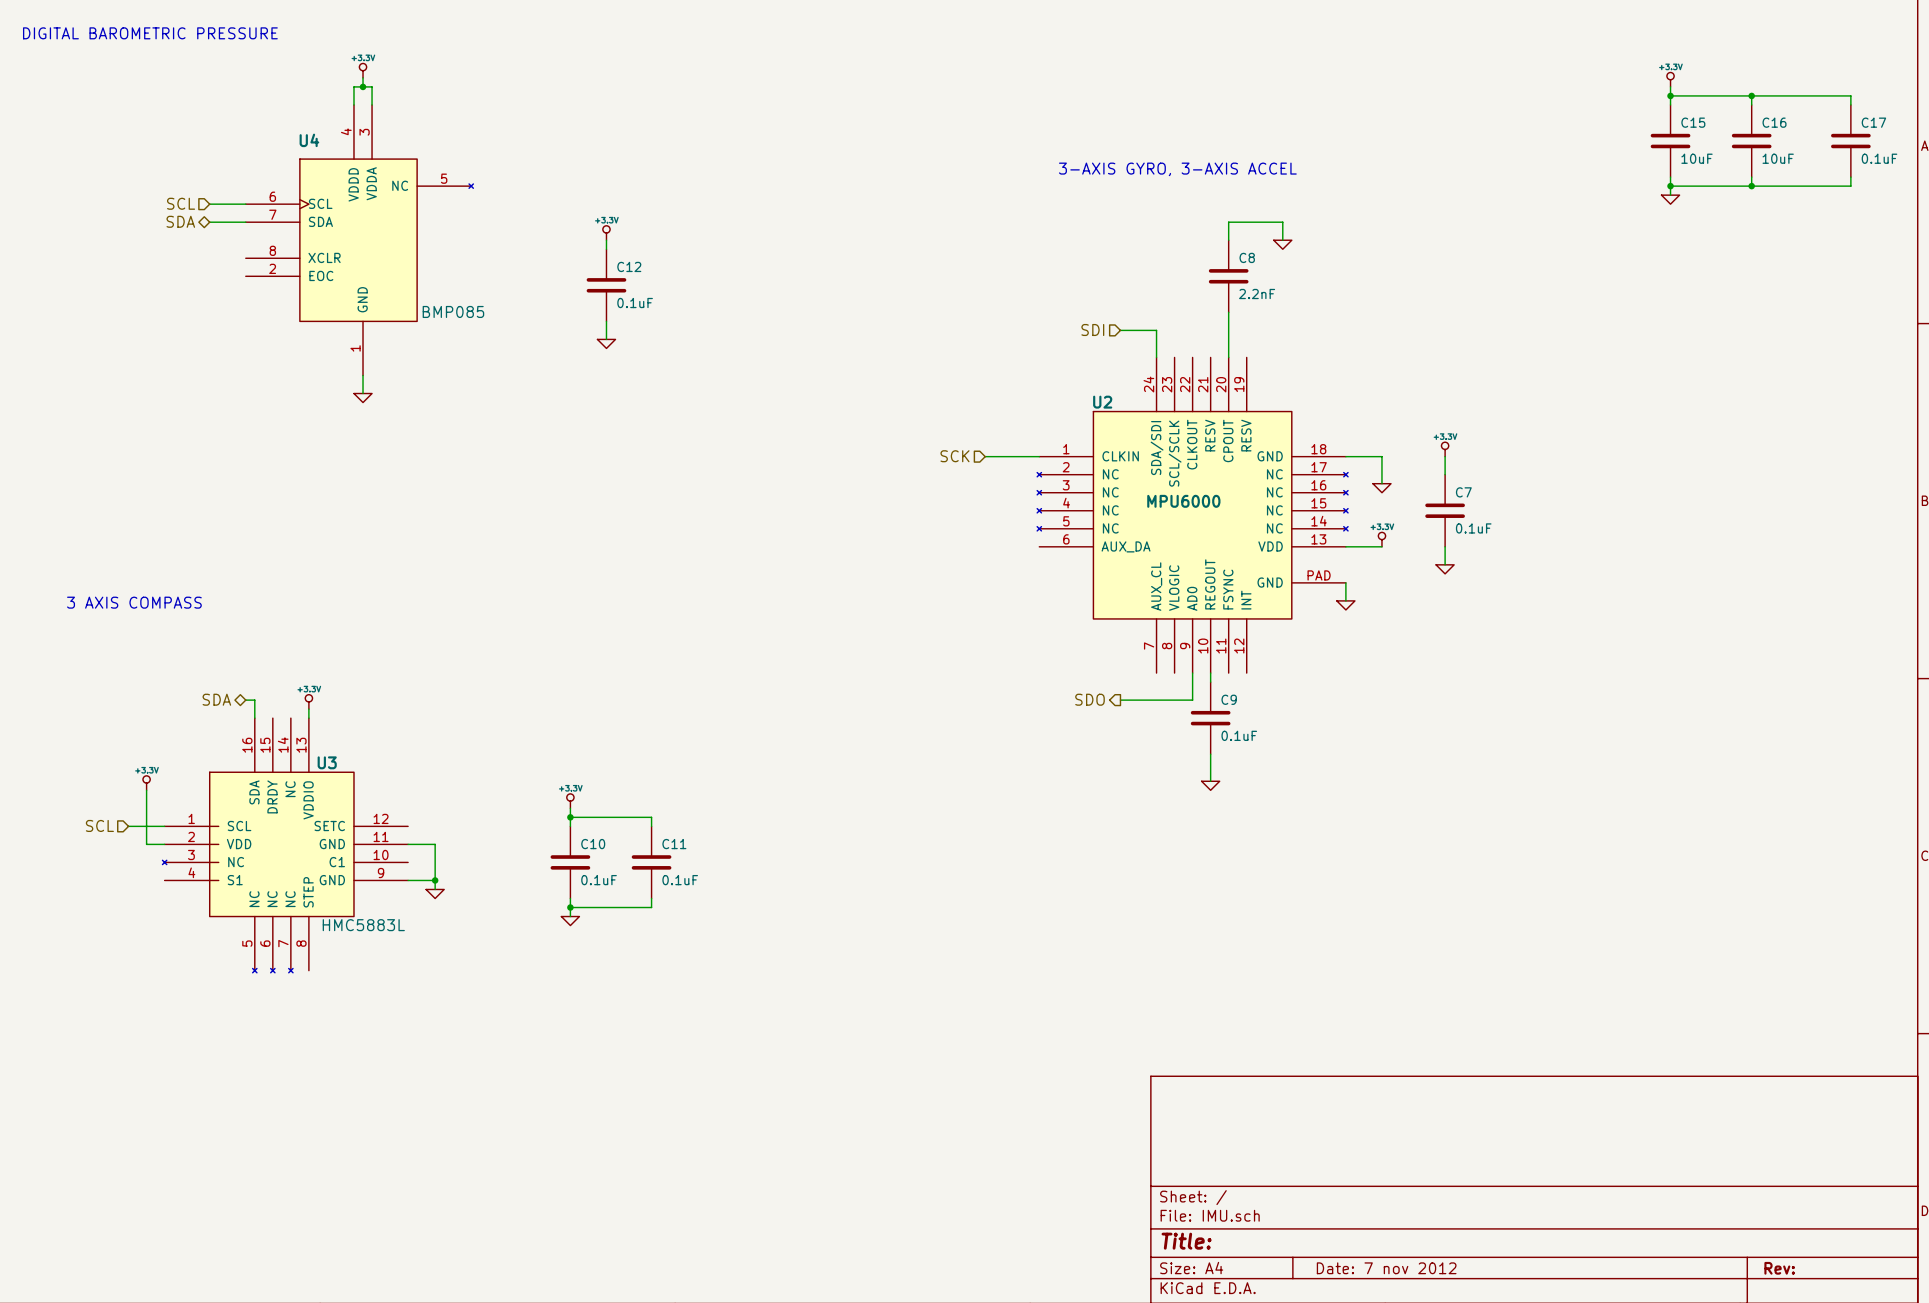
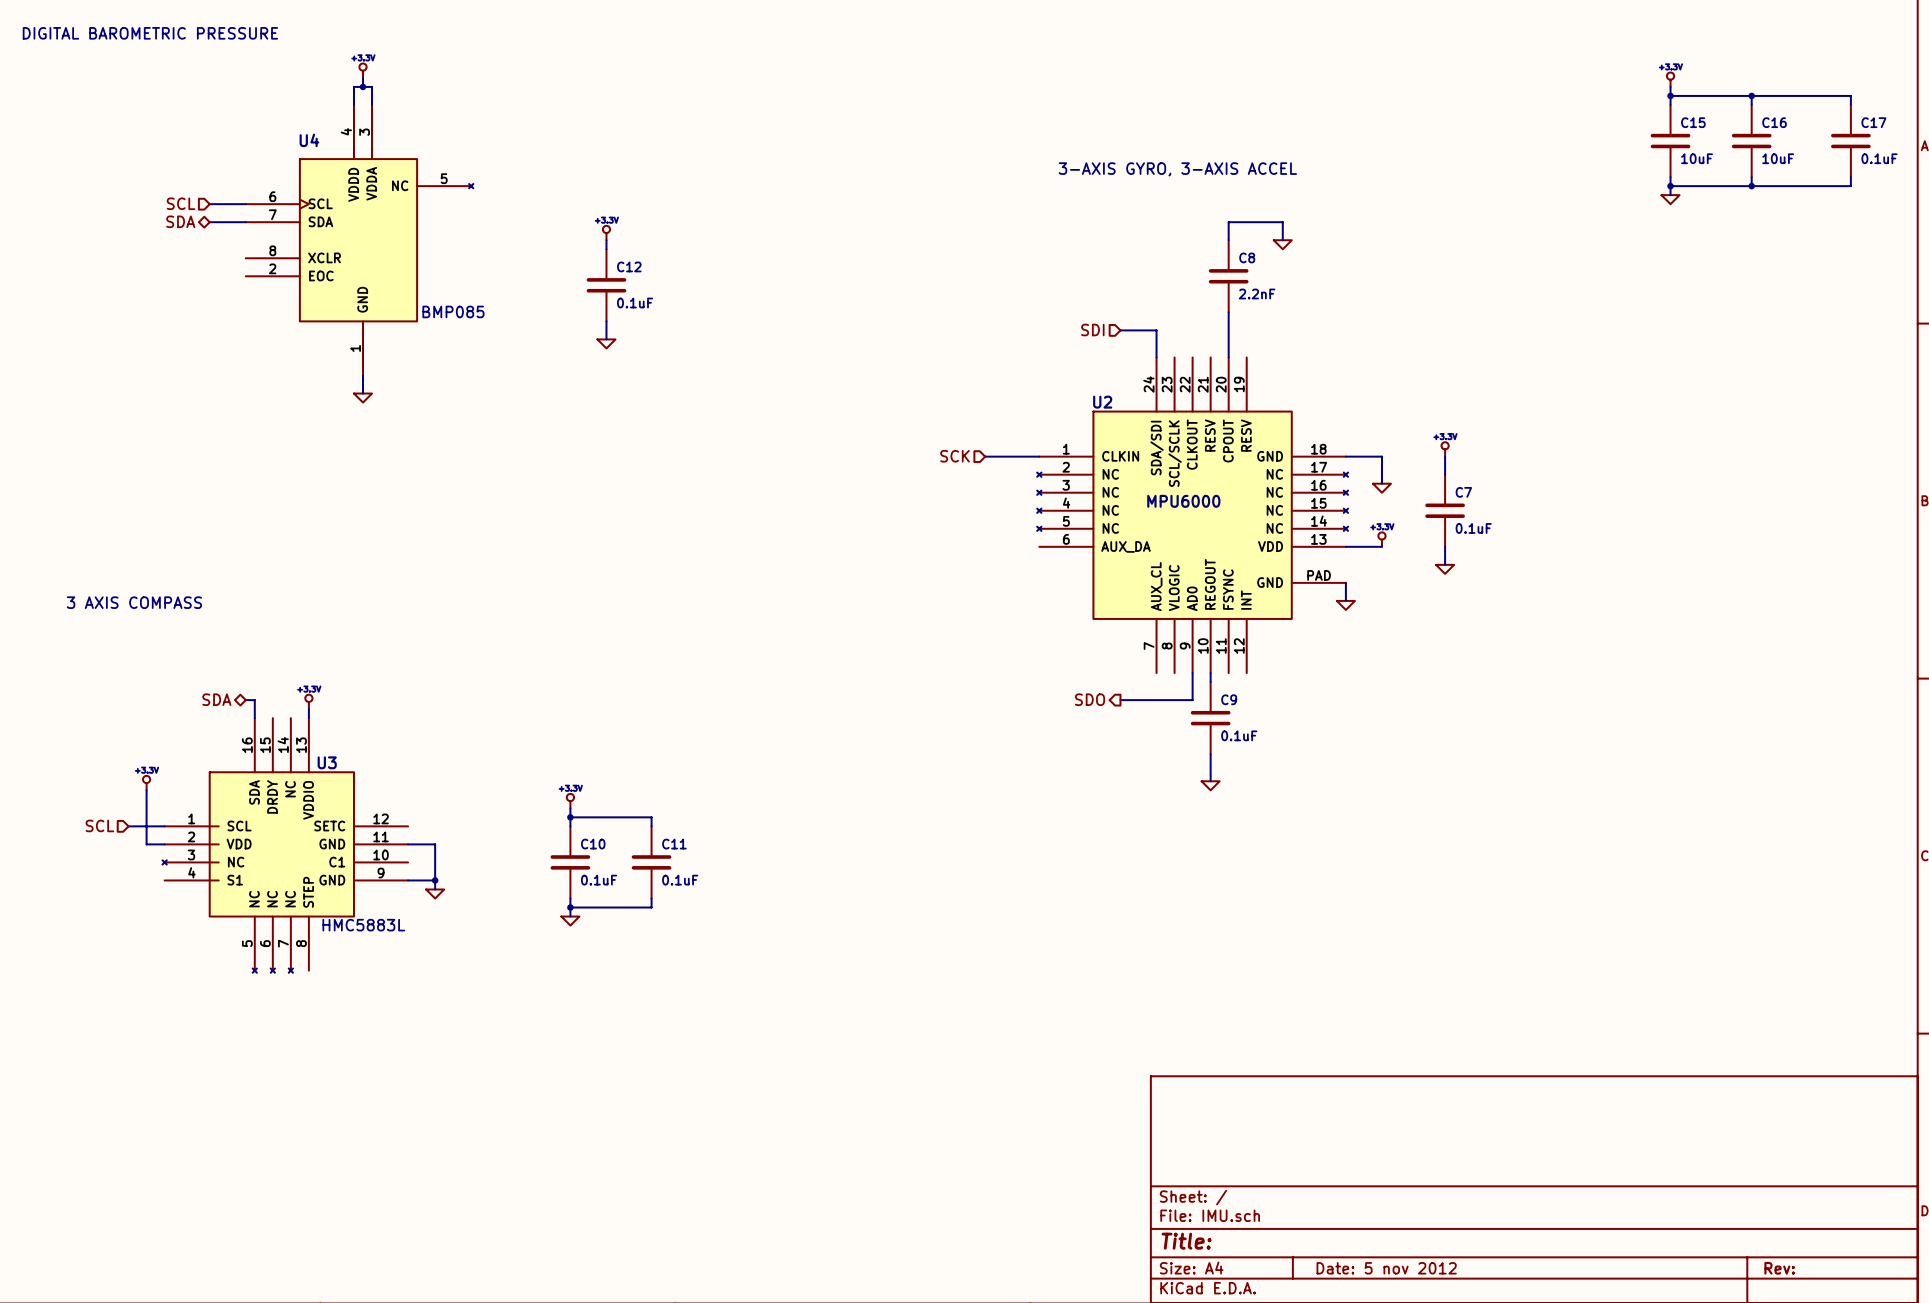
title block: Date: 7 nov 2012 (1386, 1268) -> Date: 5 nov 2012 (1386, 1268)

